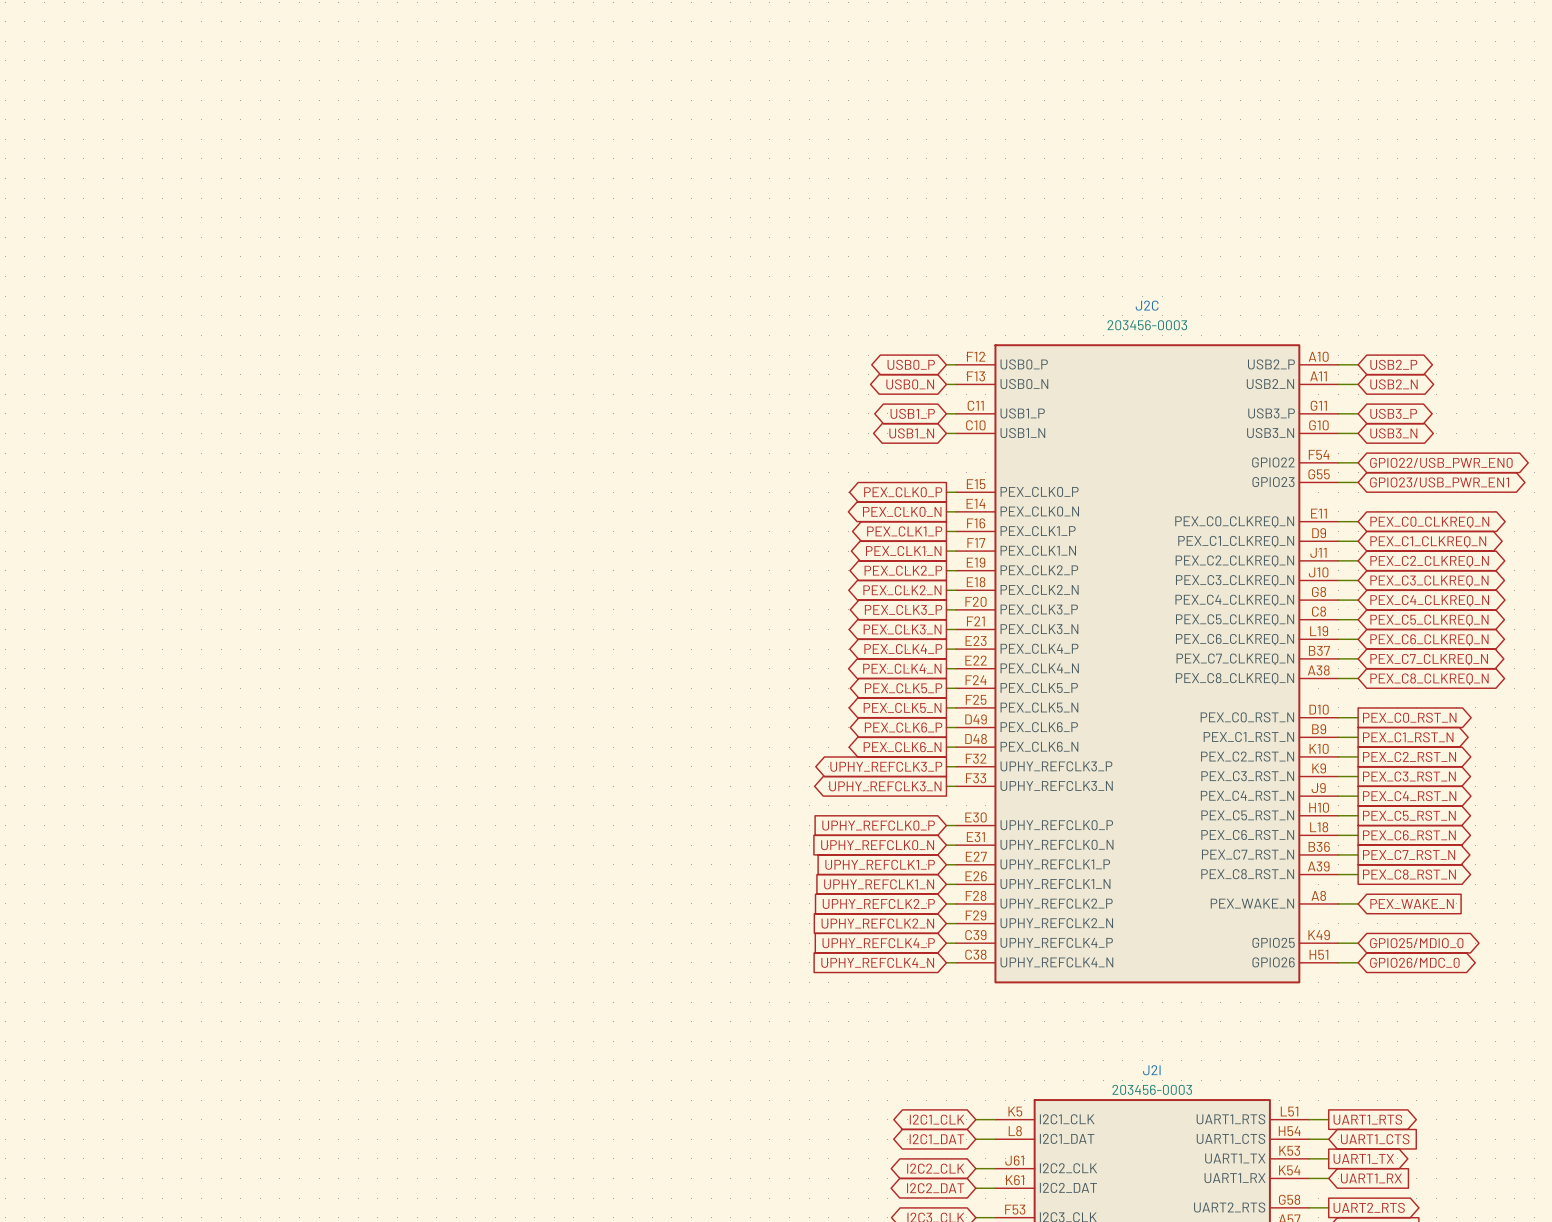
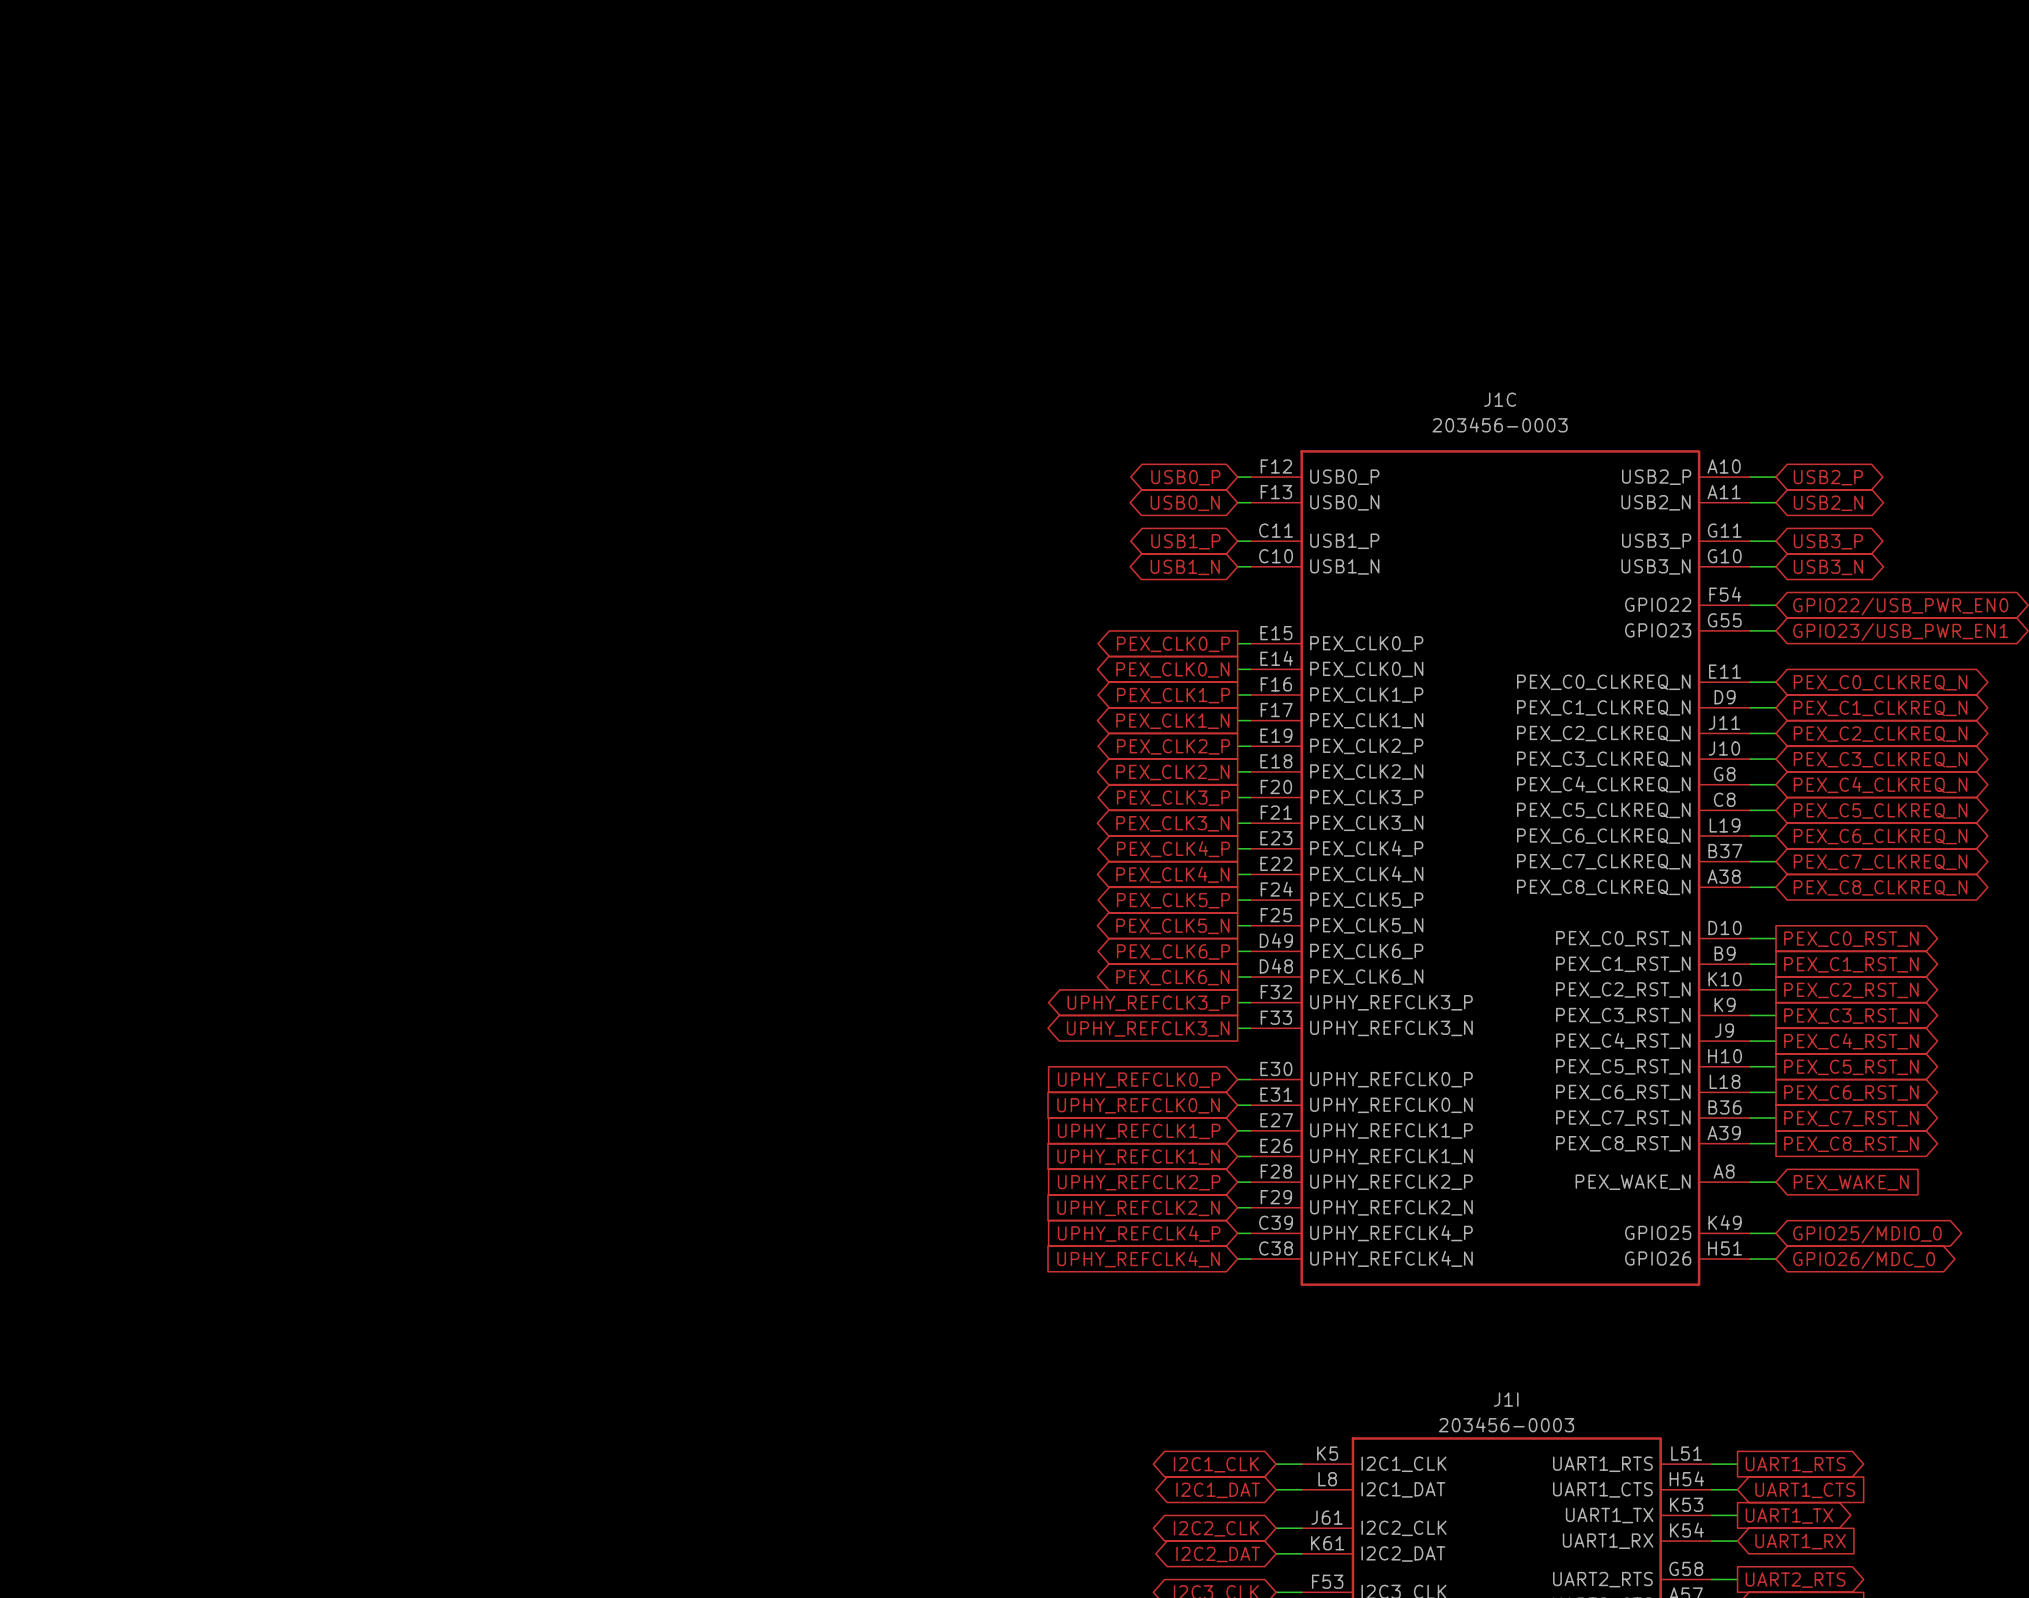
J2C name: J2C (1147, 305) -> J1C (1500, 399)
J2I name: J2I (1151, 1070) -> J1I (1506, 1399)

